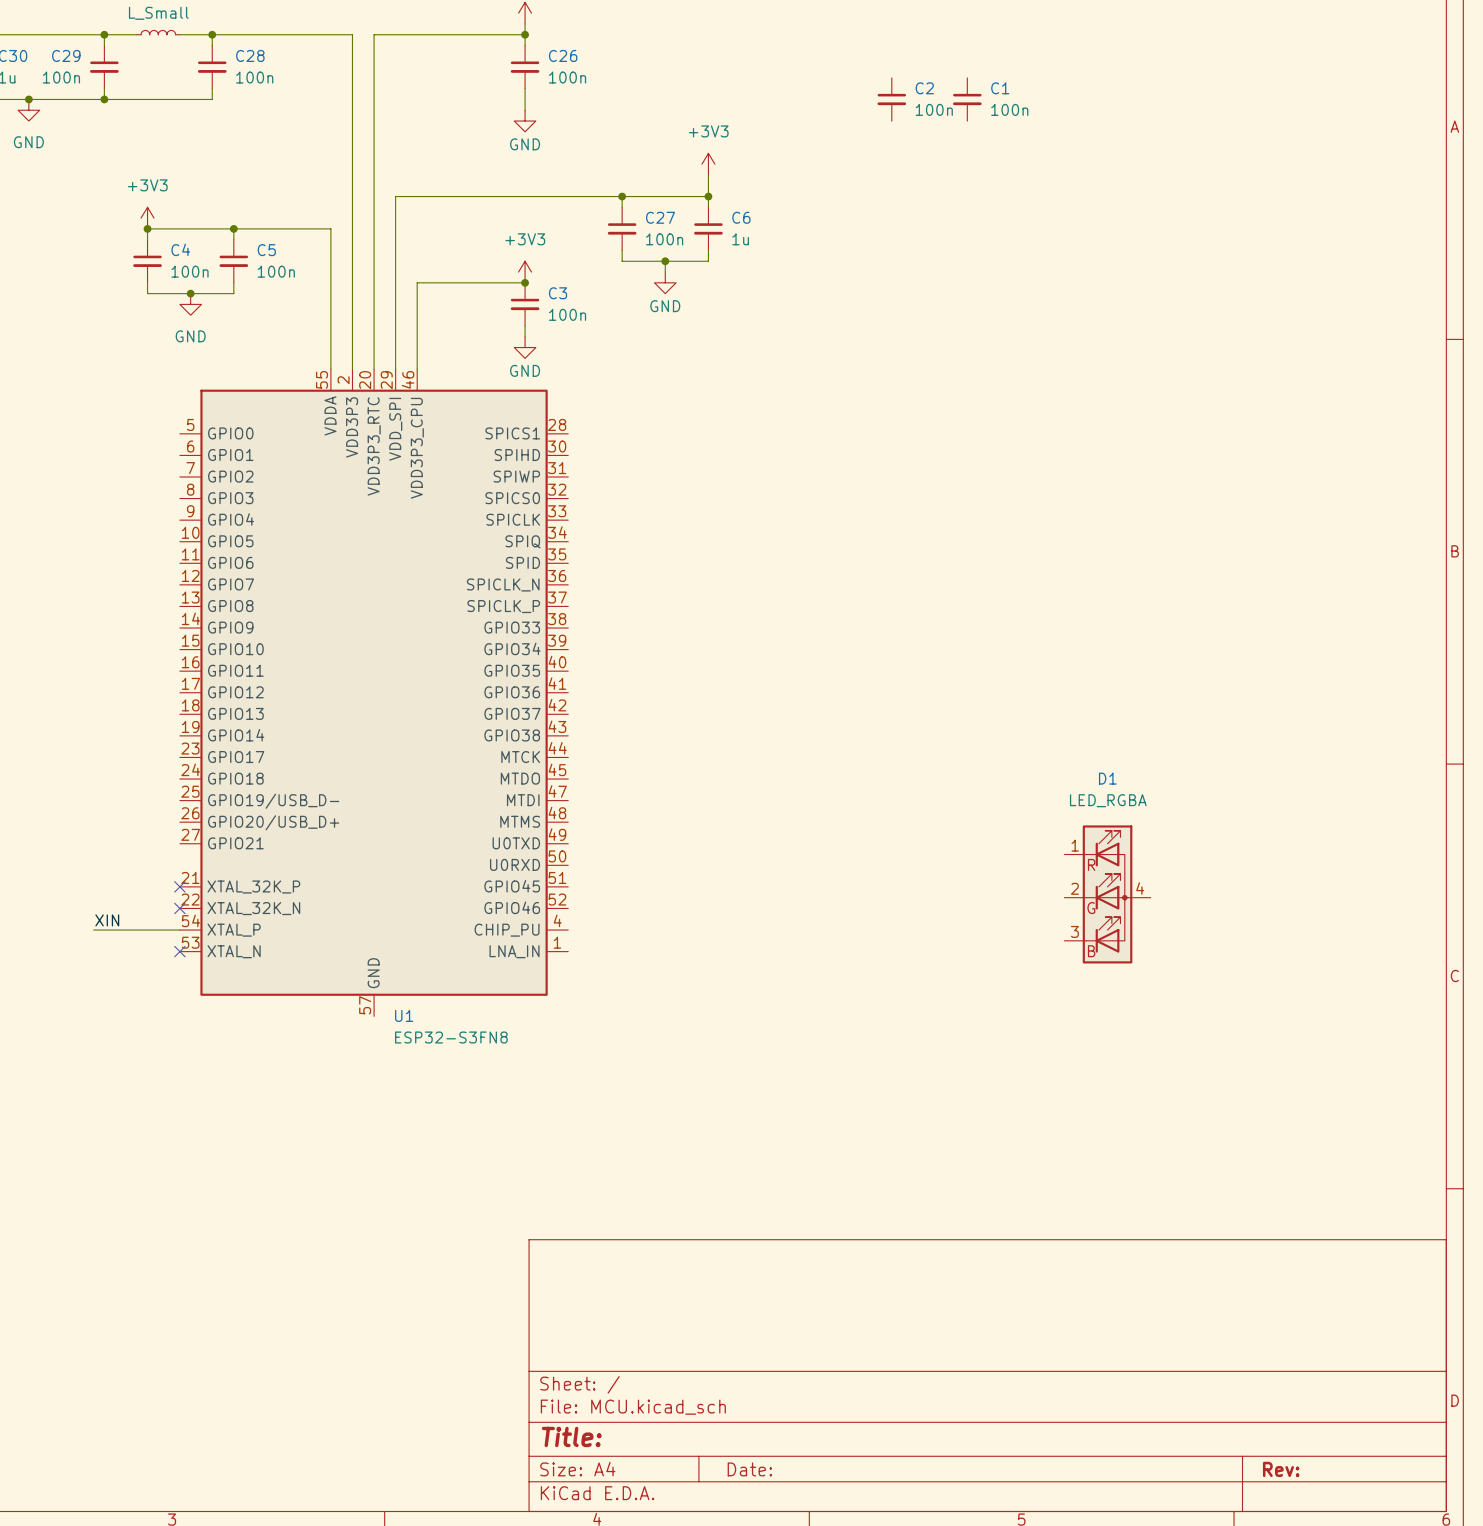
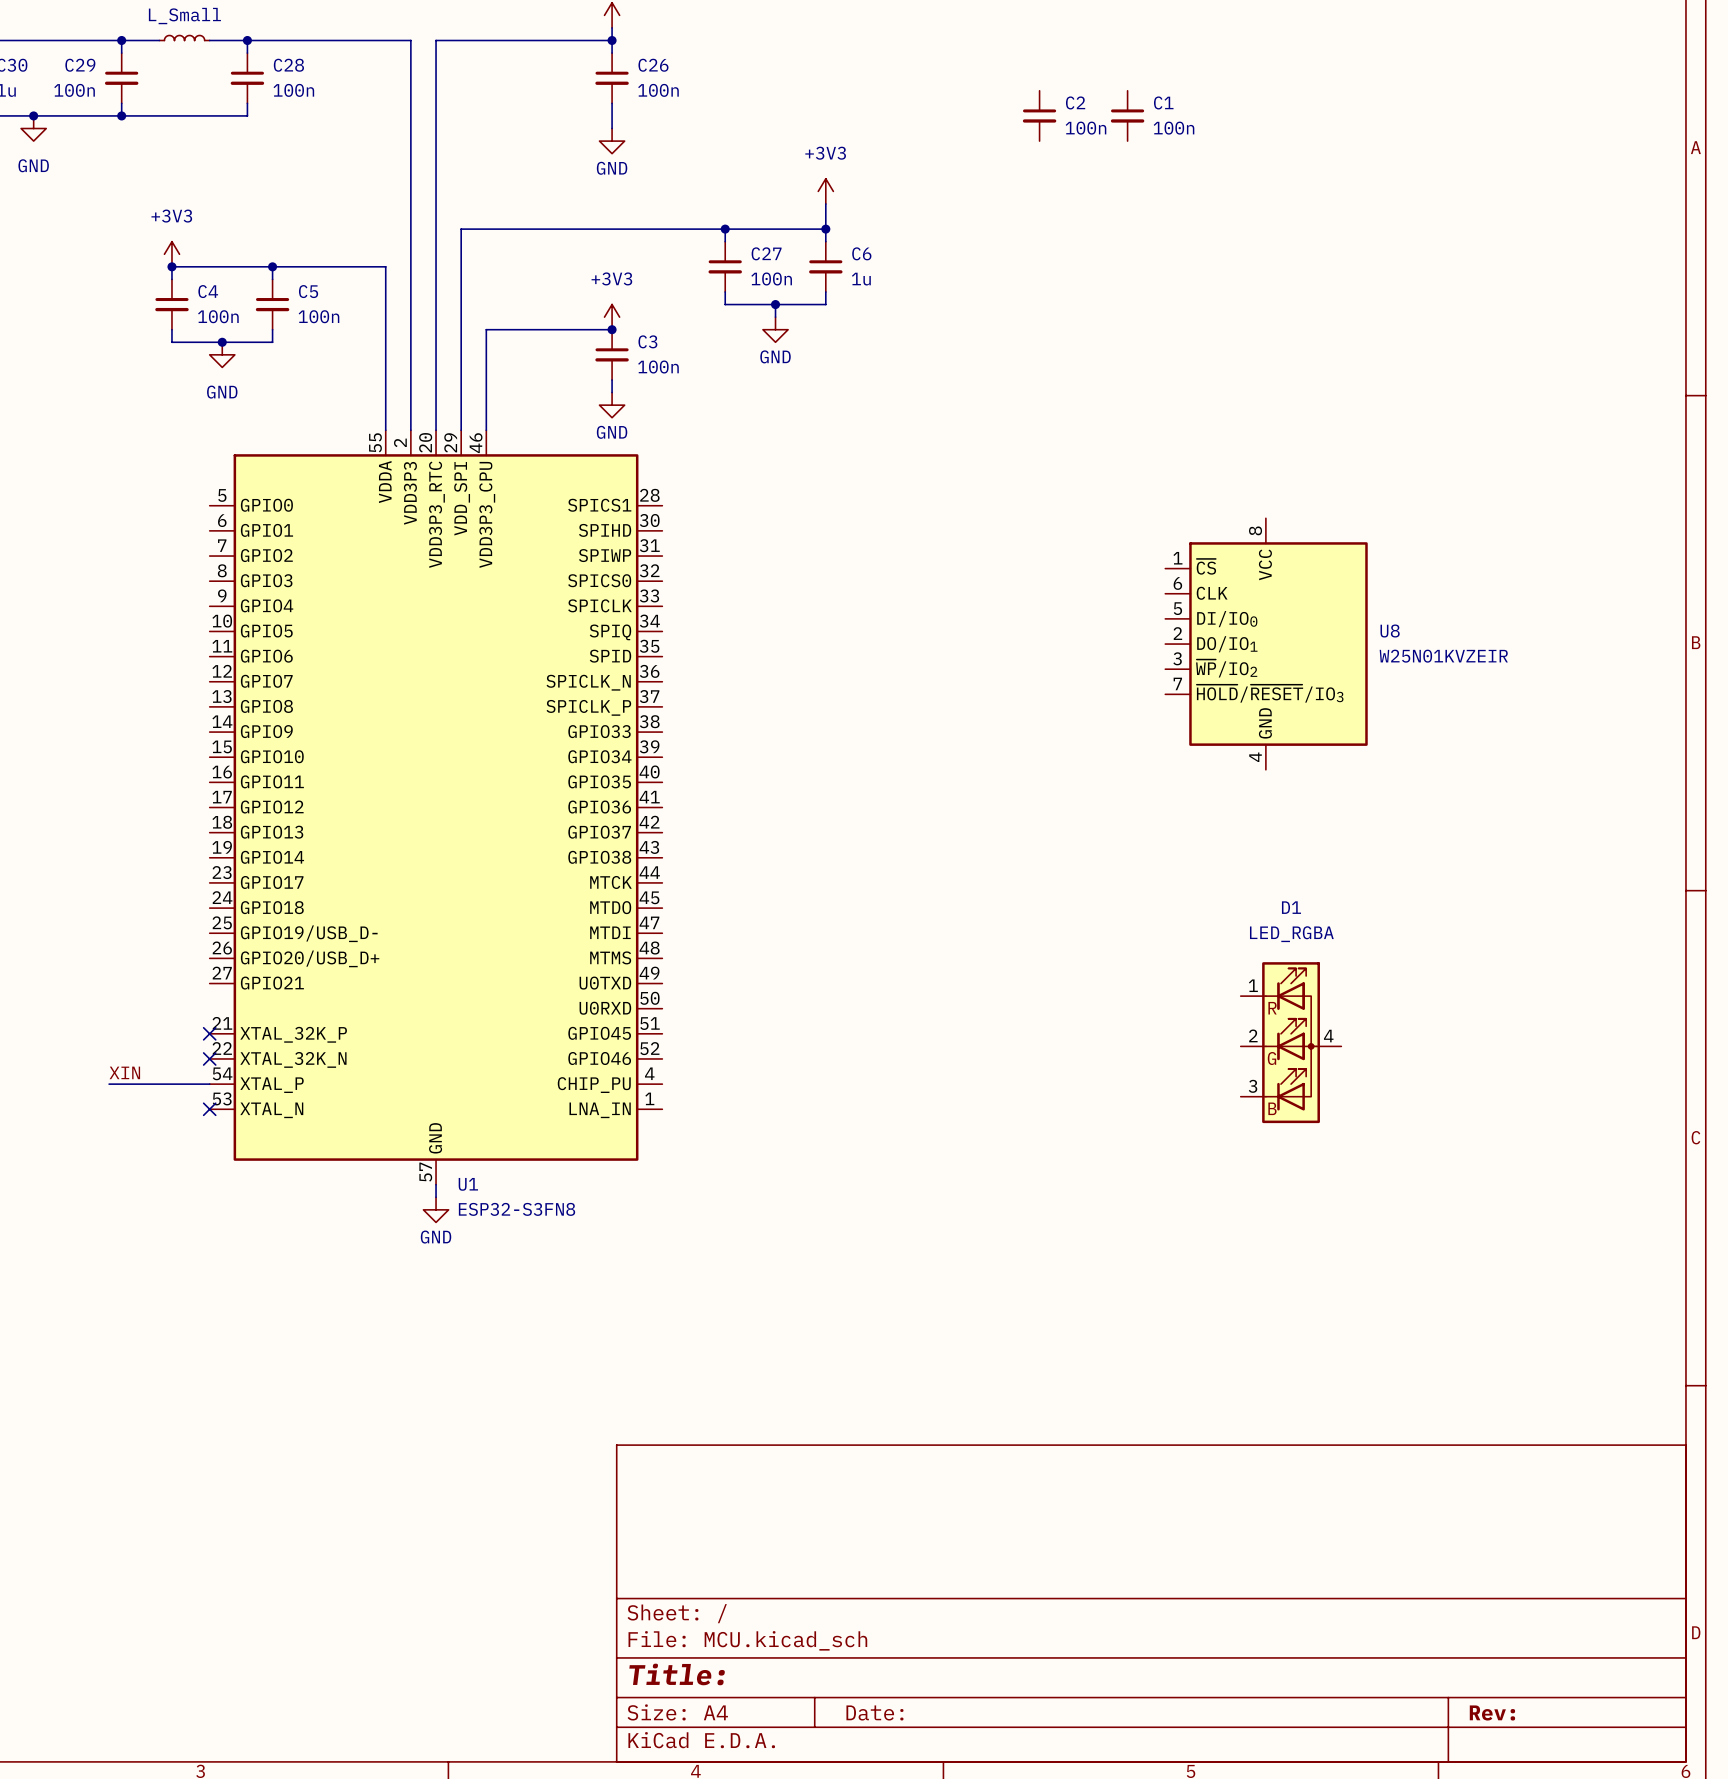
U8: none -> W25N01KVZEIR (1266, 644)
wire: none -> (436, 1184) (436, 1197)
power symbol: none -> GND (436, 1209)

